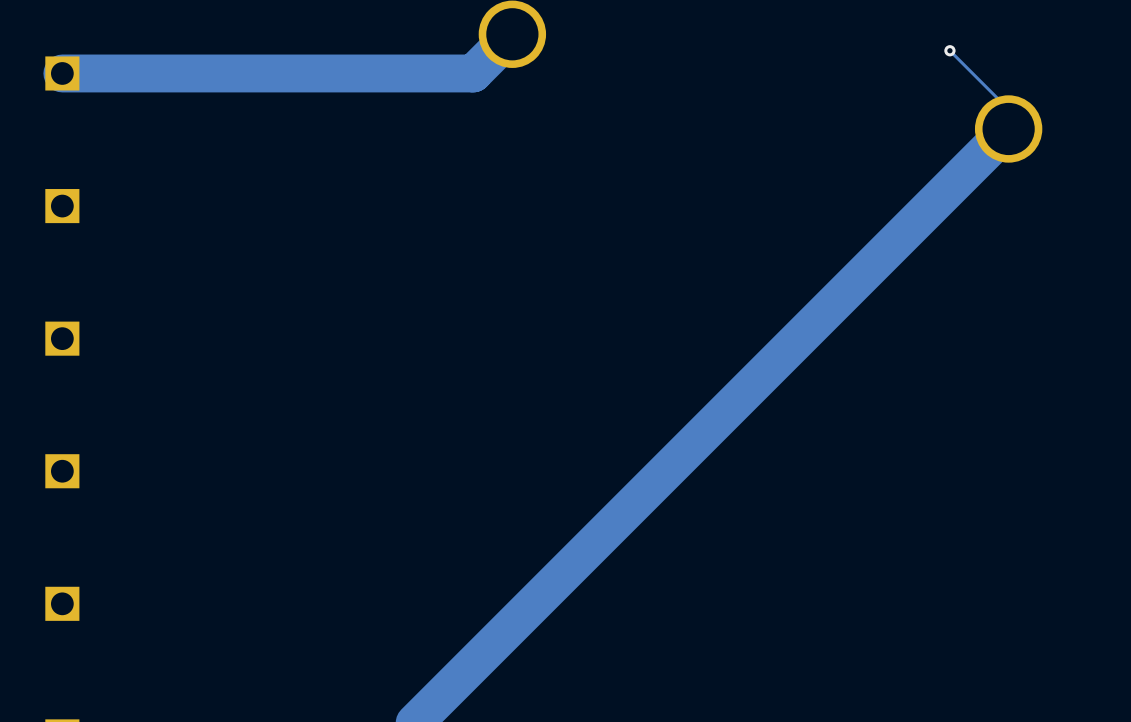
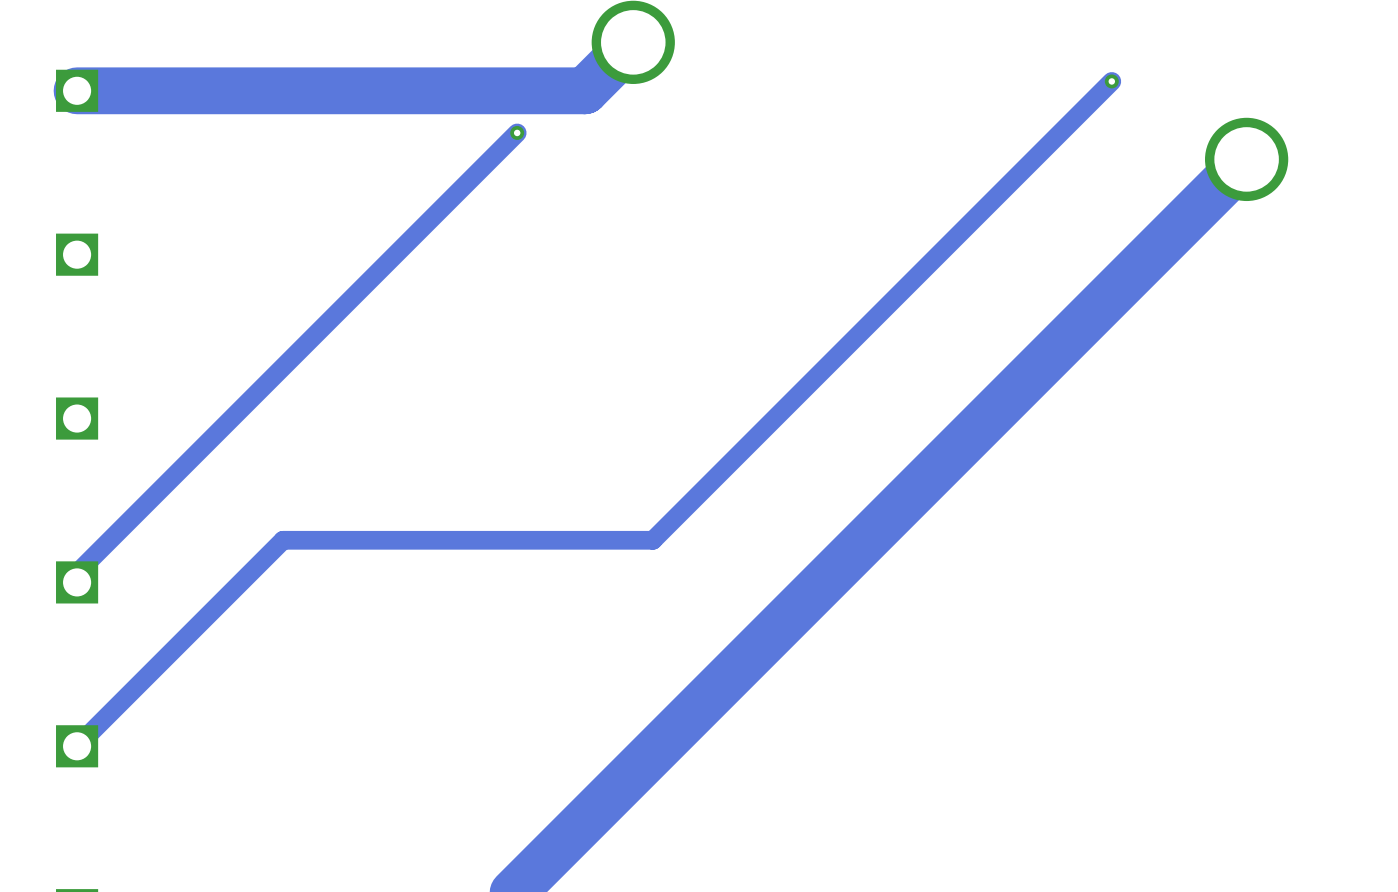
track: (949, 50) (1002, 103) (1002, 111) (1008, 128) -> none
via position: (949, 50) -> (1111, 81)
track: none -> (1111, 81) (652, 540) (283, 540) (77, 746)
track: none -> (517, 132) (77, 573) (77, 582)
via: none -> (517, 132)

